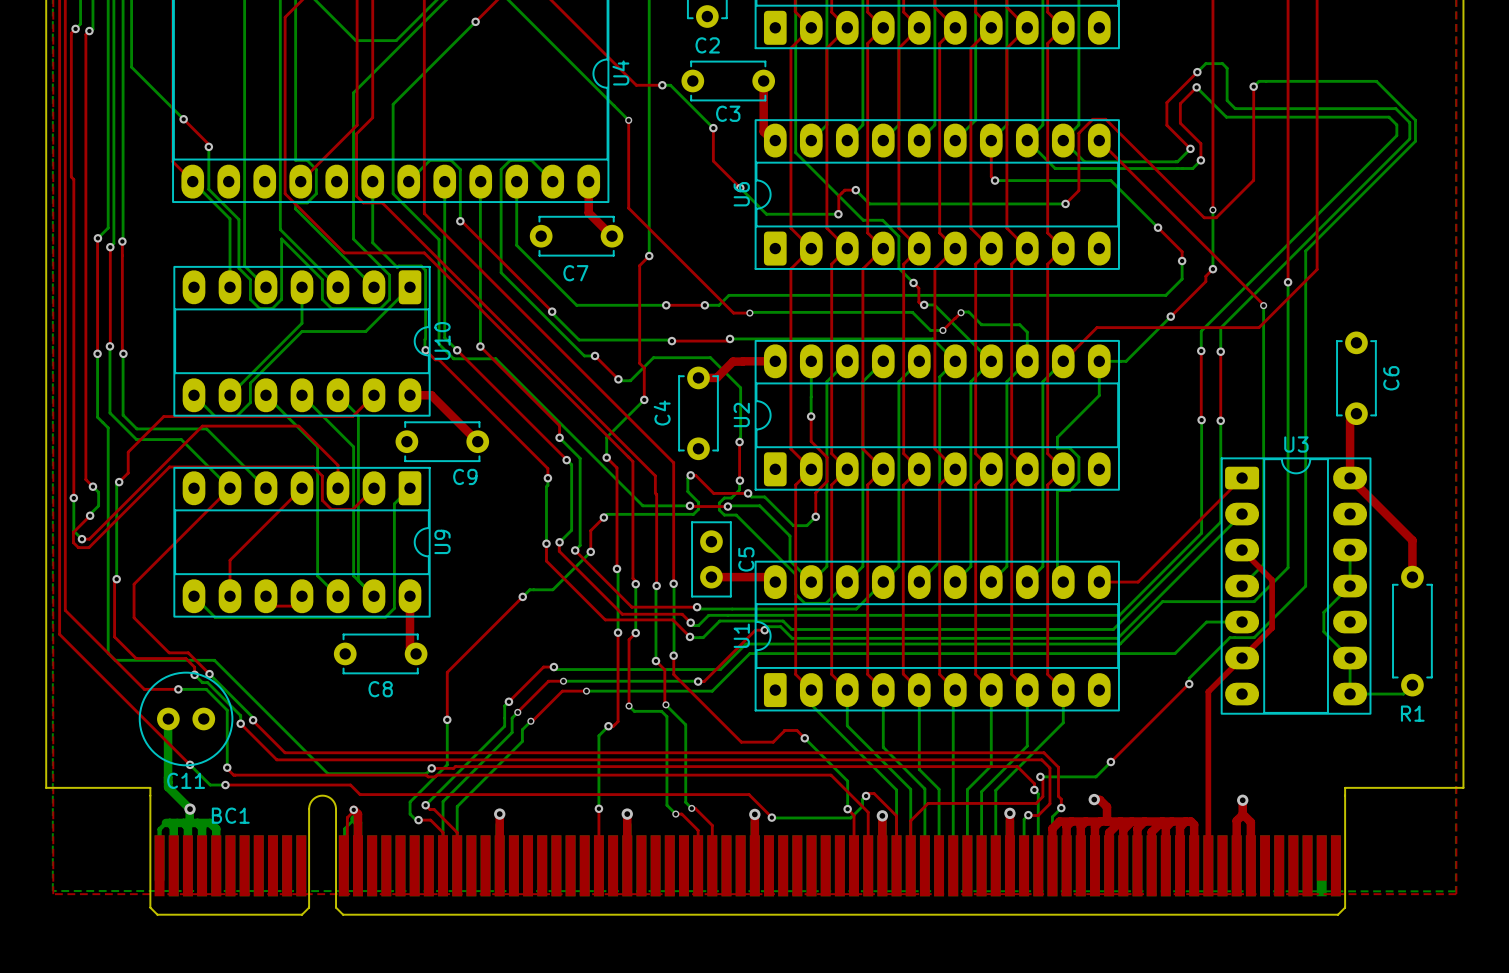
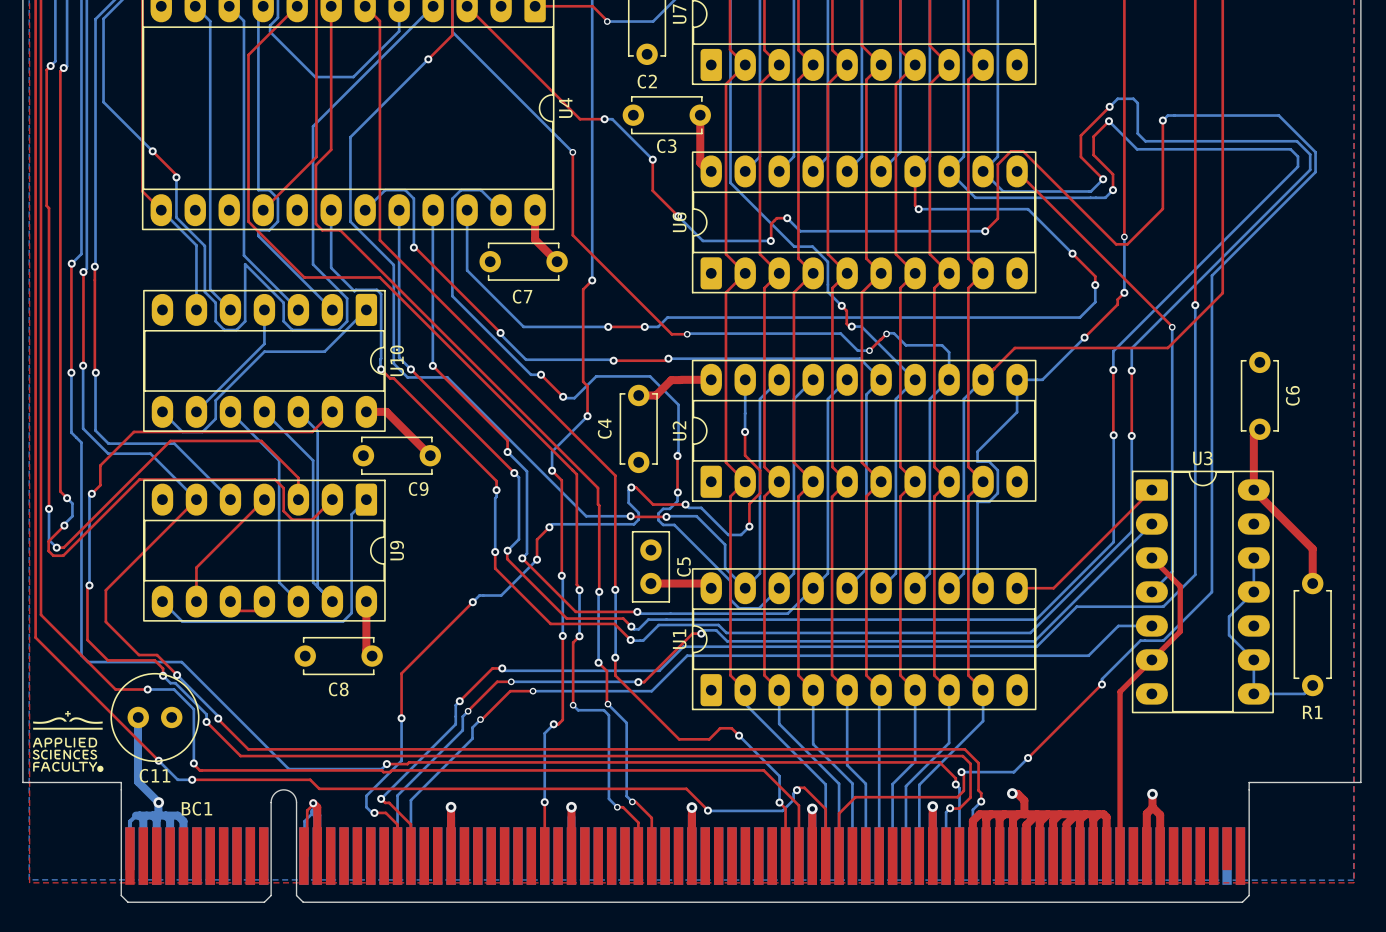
drawing: none -> [32, 711, 104, 773]

